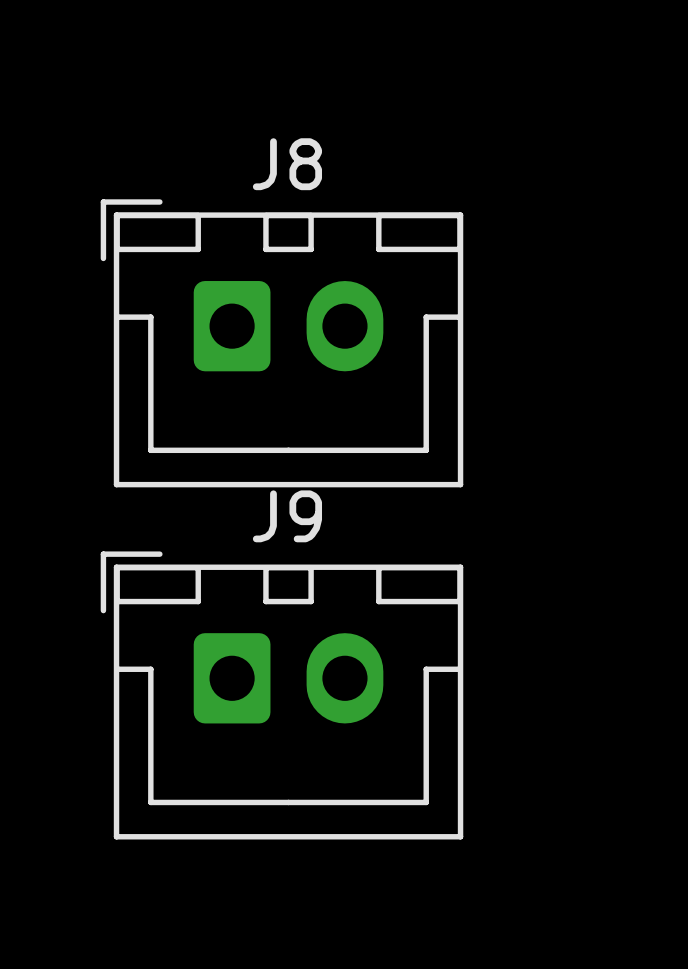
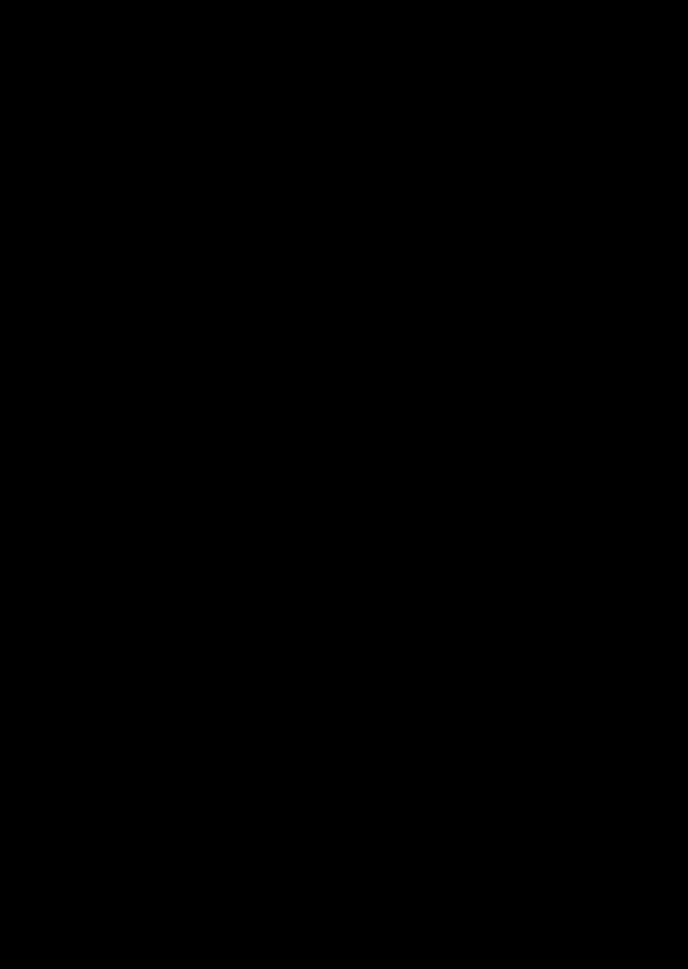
J8: (281, 343) -> none
J9: (281, 695) -> none

